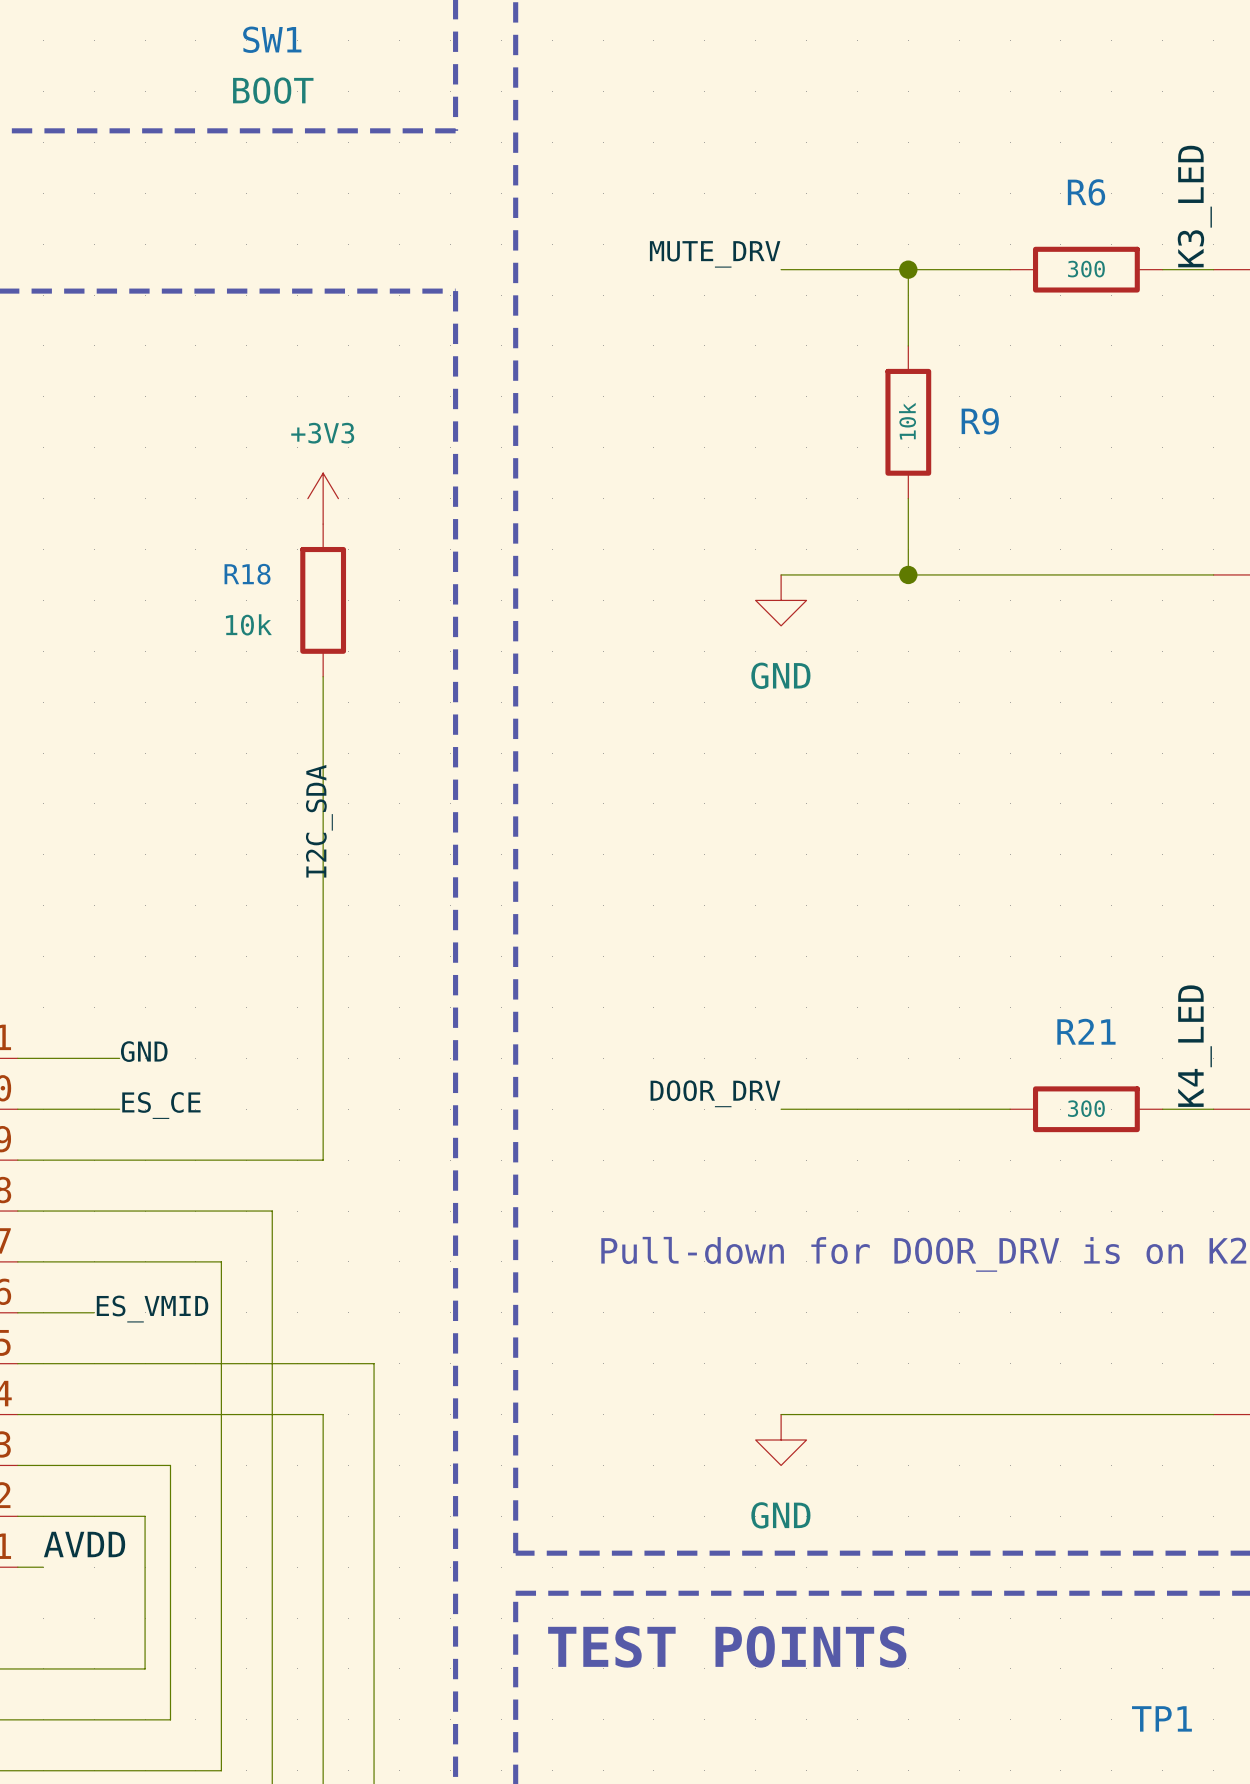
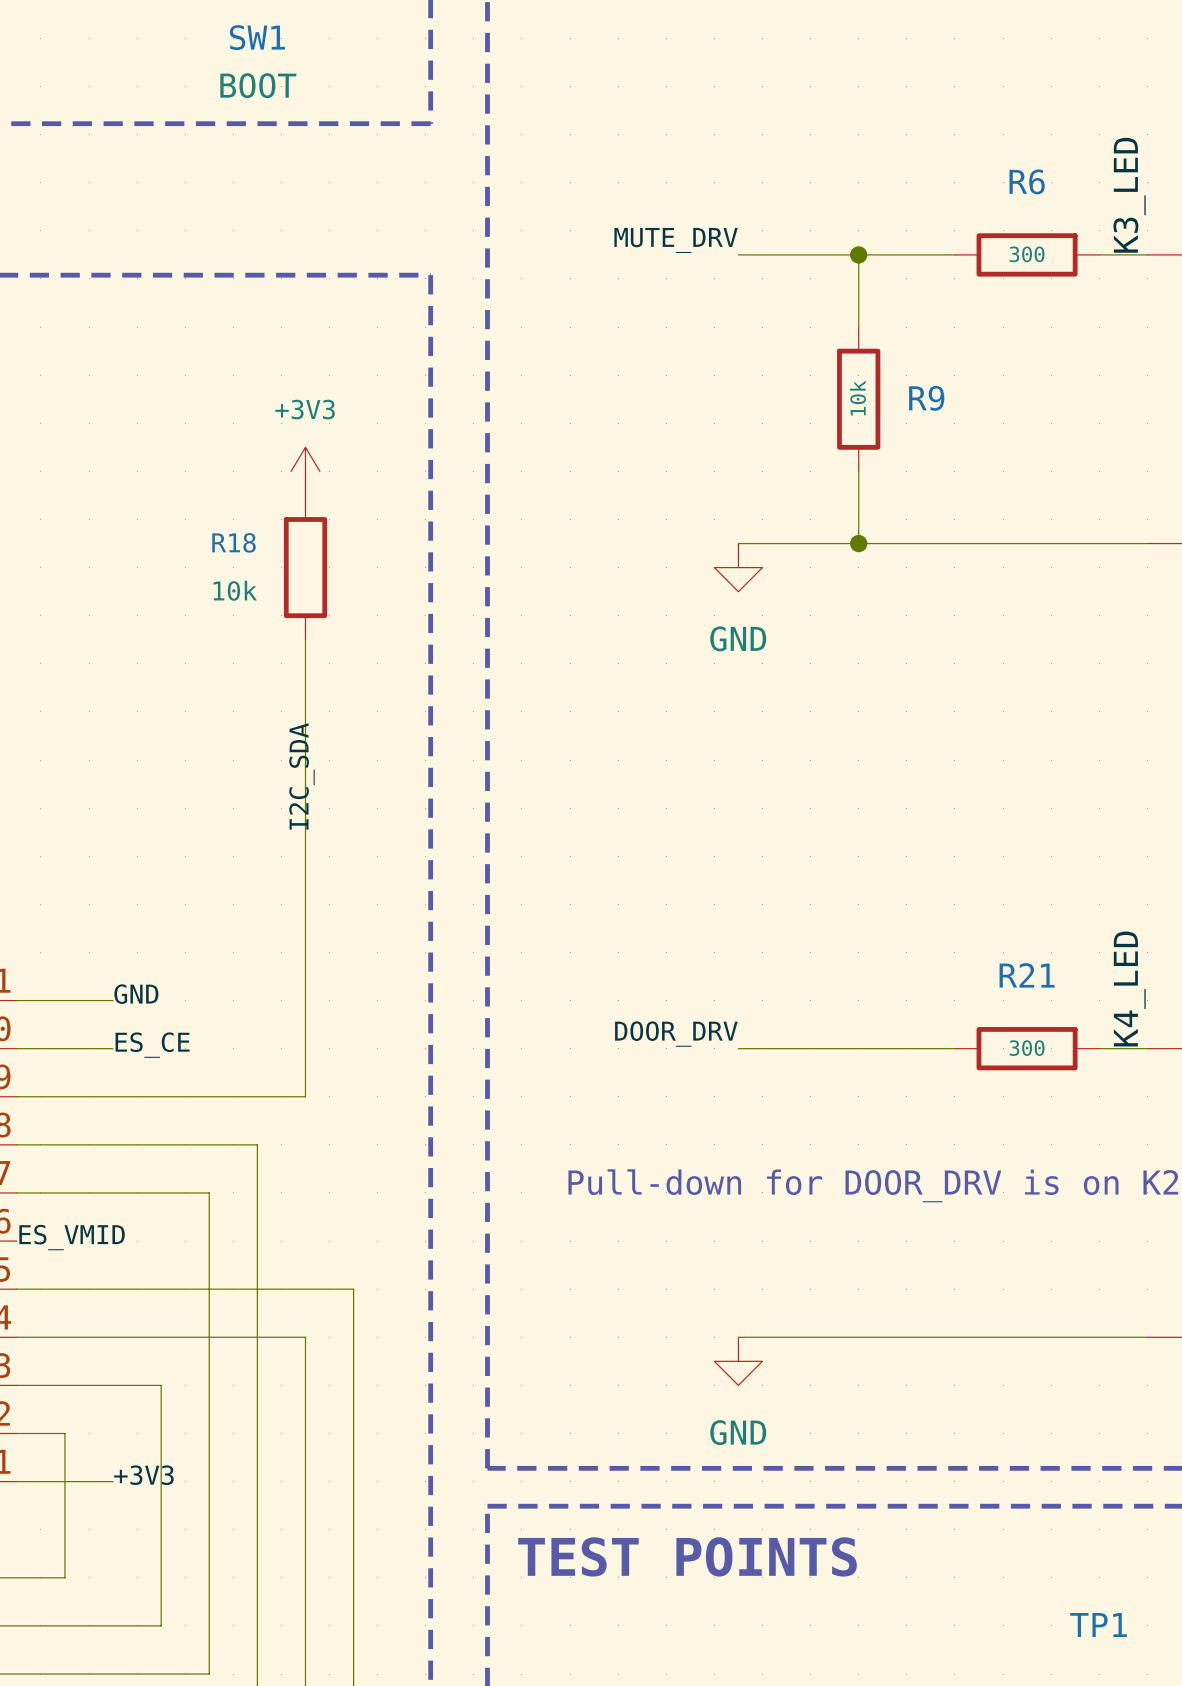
label position: ES_VMID (152, 1309) -> ES_VMID (72, 1237)
wire: (17, 1312) (94, 1312) -> (40, 1481) (113, 1481)
wire: (68, 1516) (145, 1516) (145, 1668) (68, 1668) -> (64, 1433) (64, 1577)
label: AVDD (84, 1544) -> none
label: none -> +3V3 (143, 1475)

